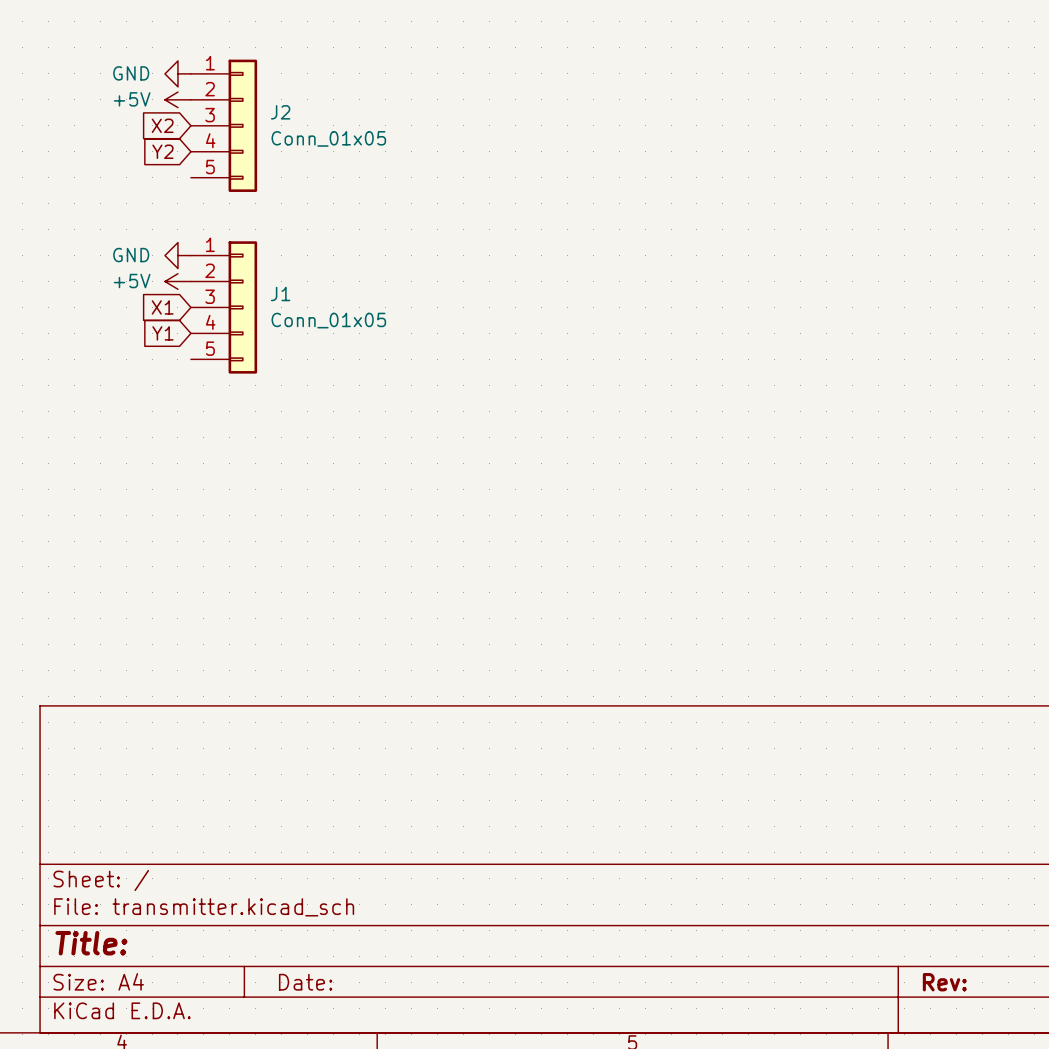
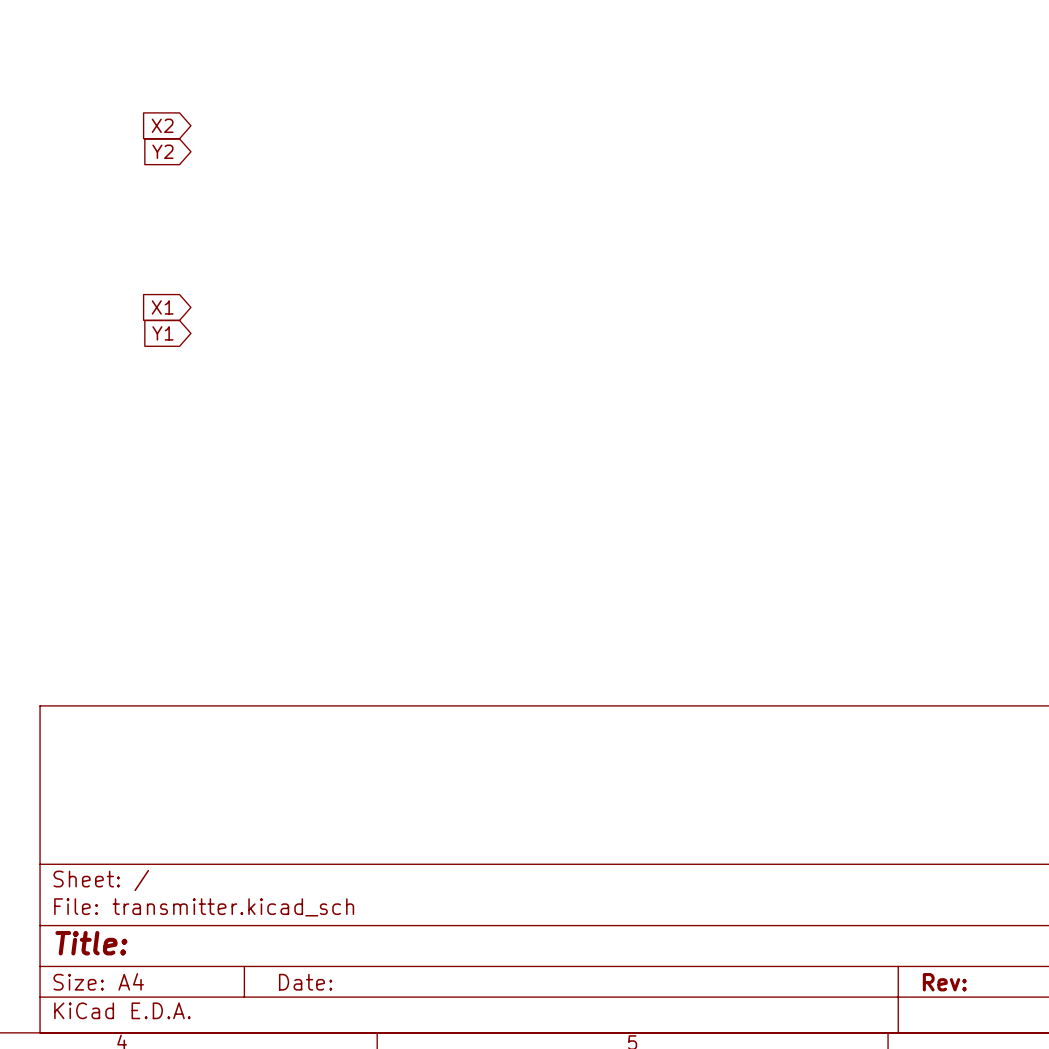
power symbol: GND (177, 73) -> none
power symbol: +5V (177, 99) -> none
J2: Conn_01x05 (224, 125) -> none
power symbol: GND (177, 255) -> none
power symbol: +5V (177, 281) -> none
J1: Conn_01x05 (224, 307) -> none

